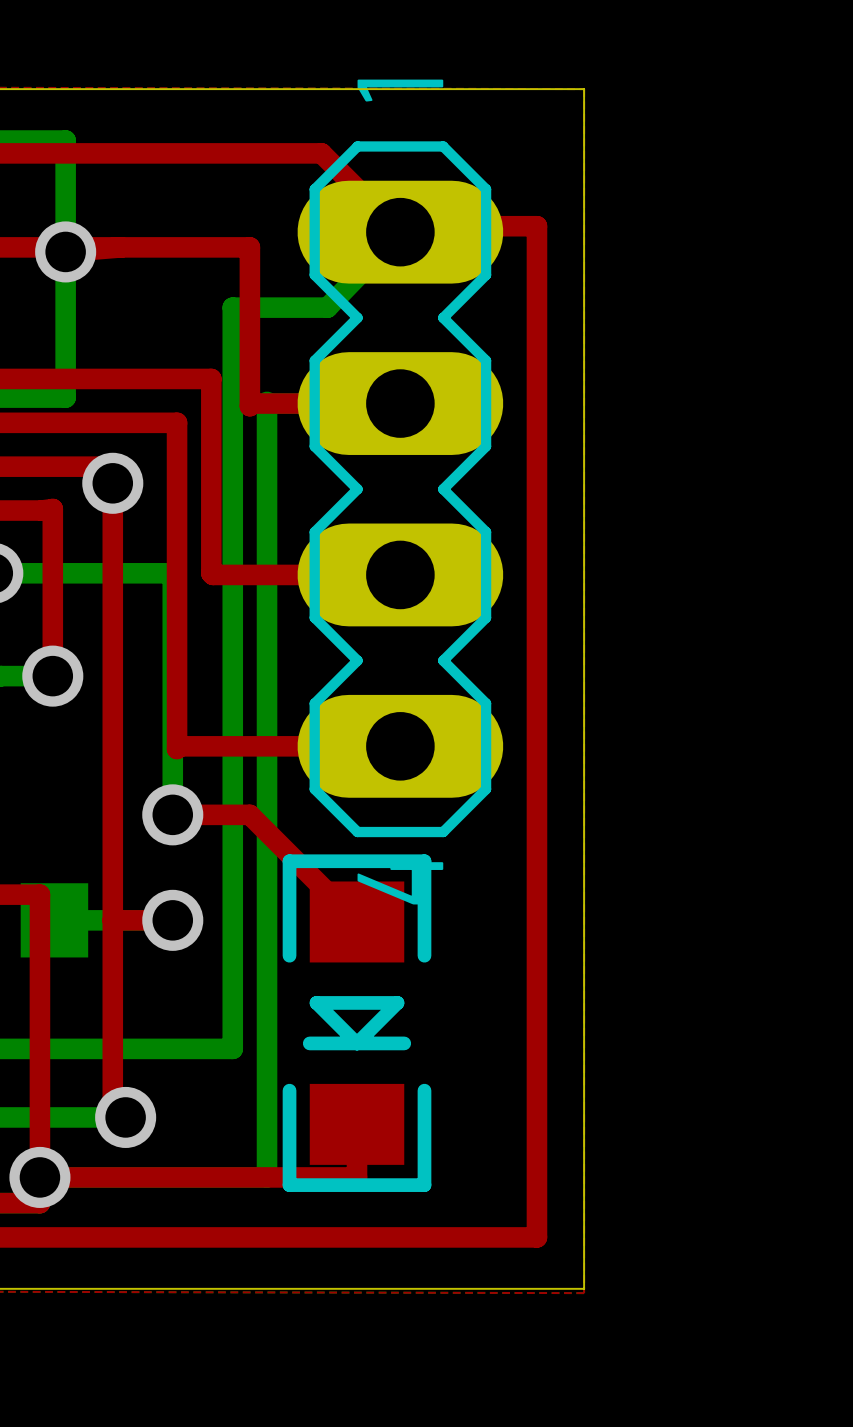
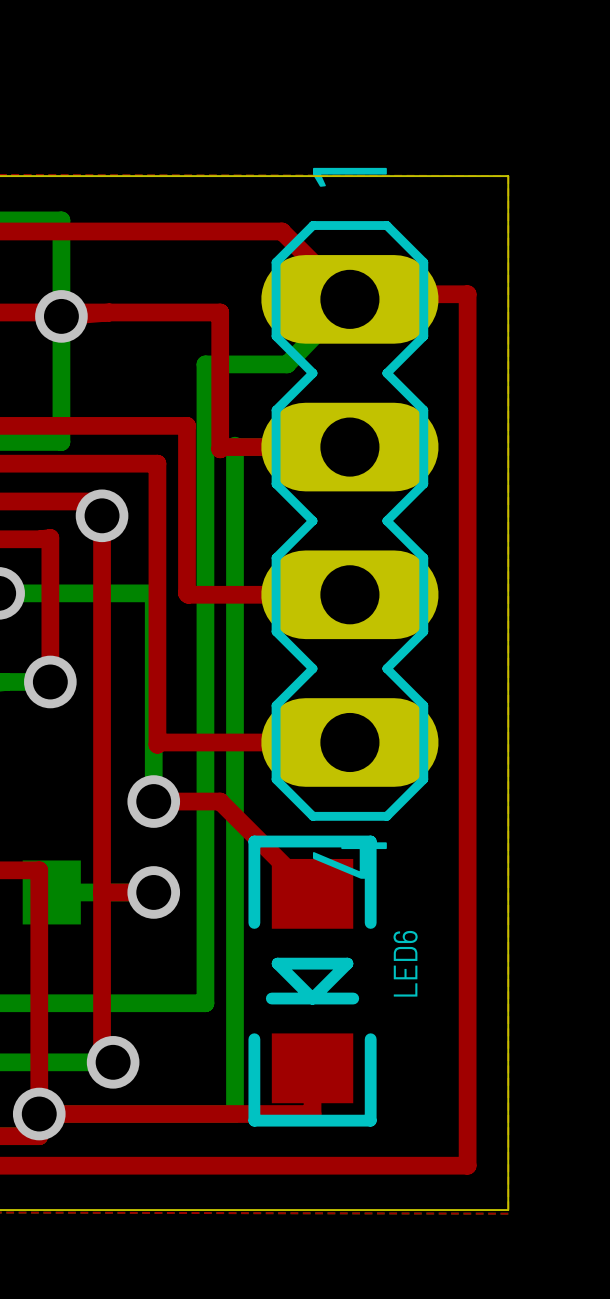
LED6 name: none -> LED6 (405, 963)

